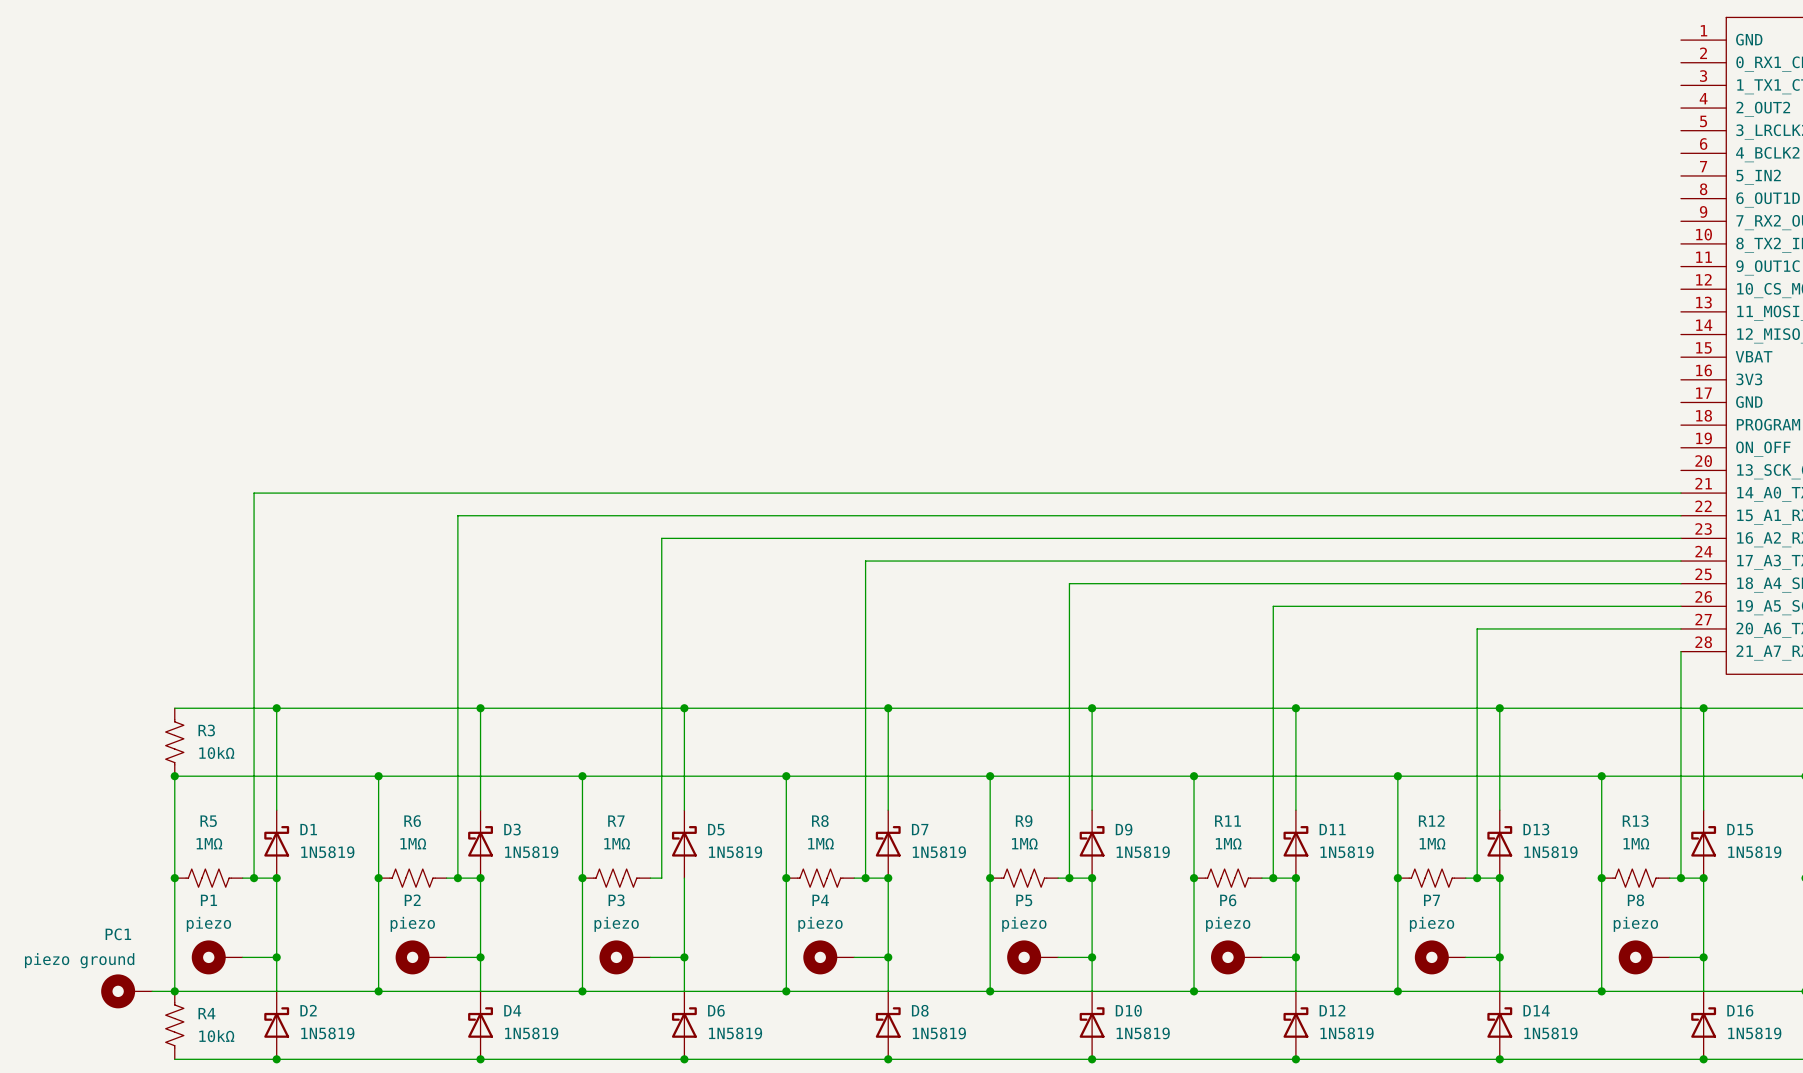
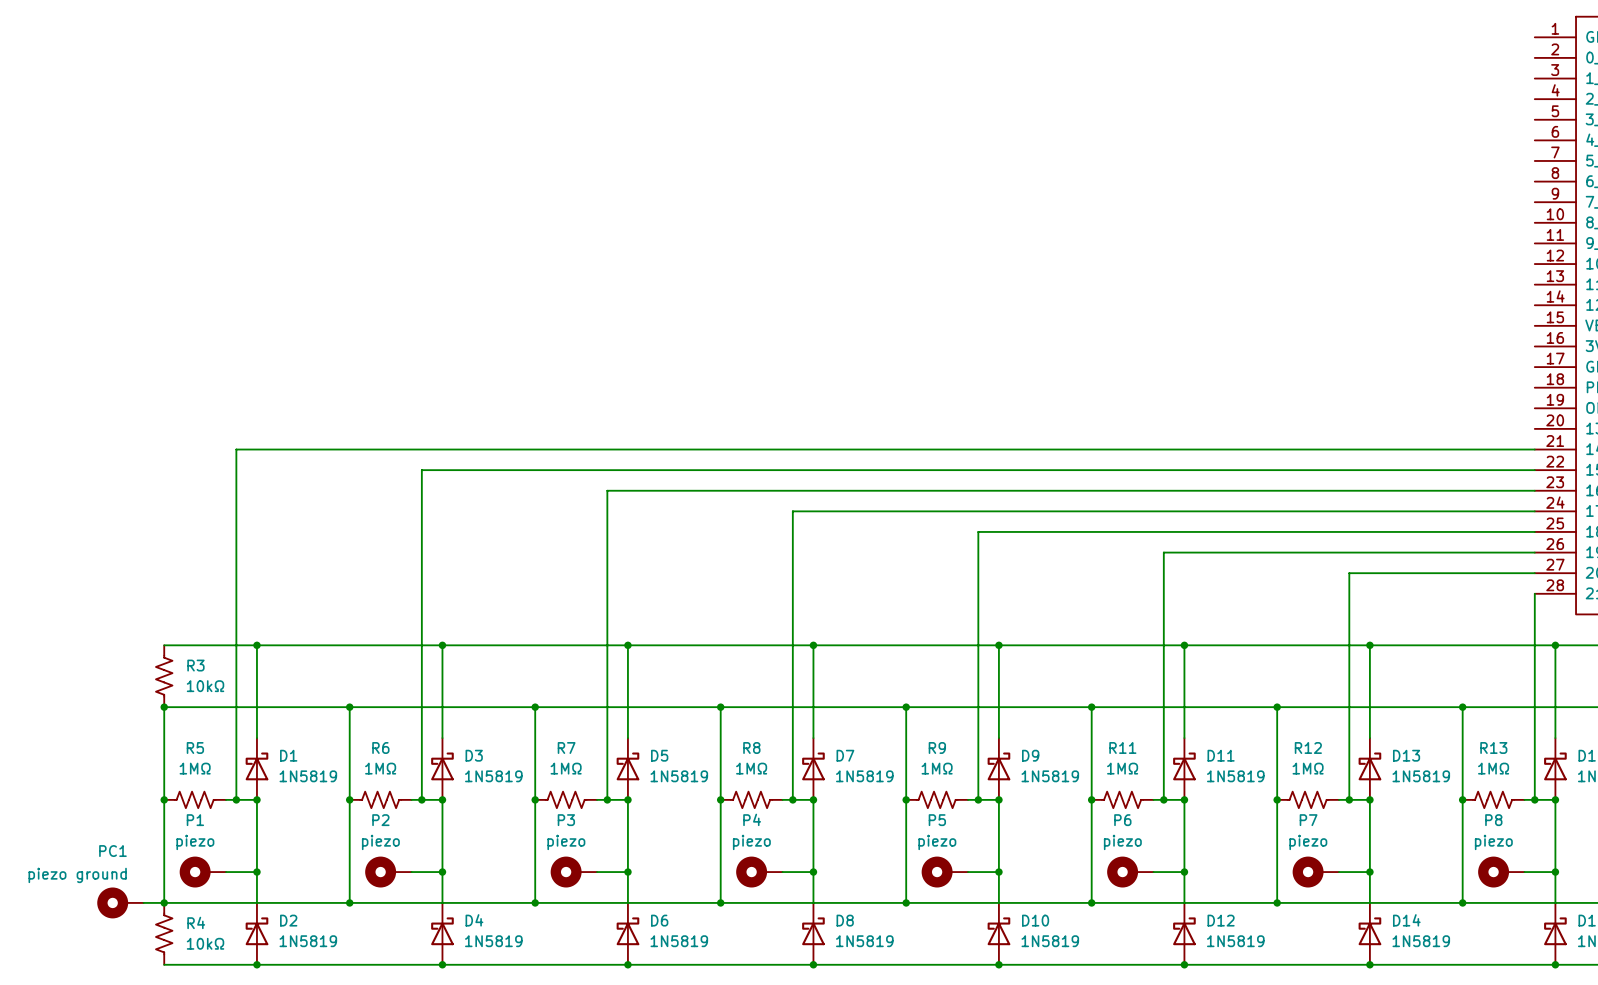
wire: none -> (607, 799) (627, 799)
junction: none -> (607, 799)
junction: none -> (627, 799)

